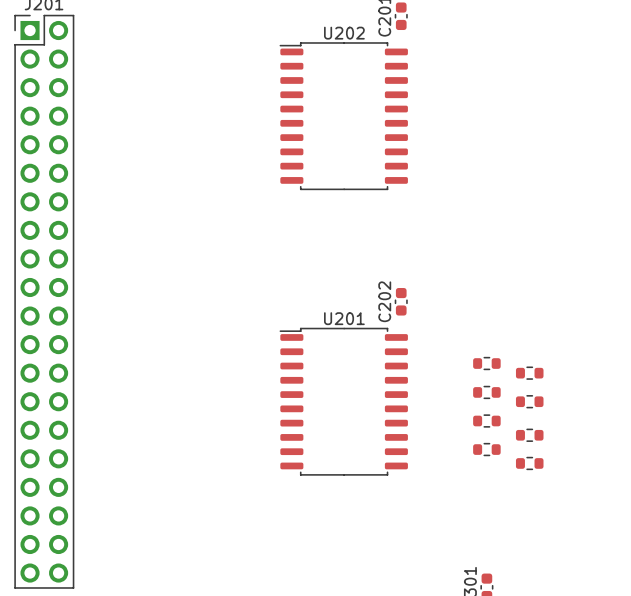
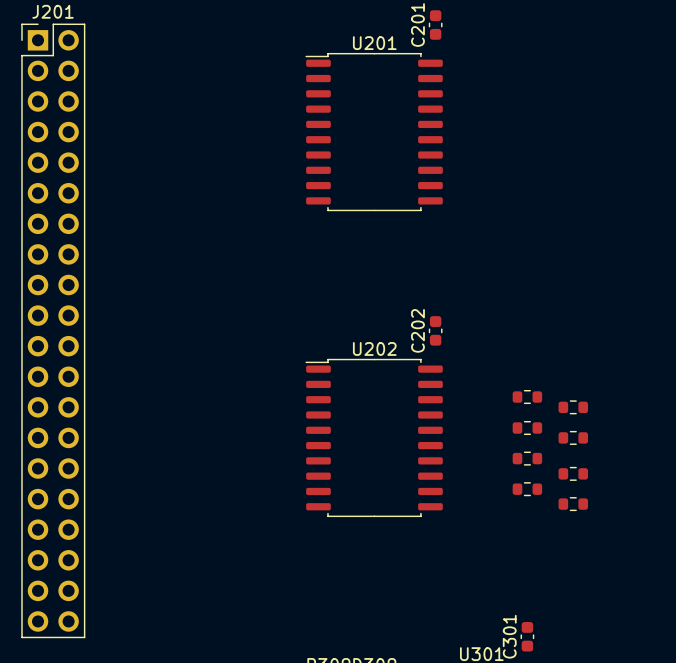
U202 name: U202 (344, 33) -> U201 (374, 43)
U201 name: U201 (344, 318) -> U202 (374, 348)

